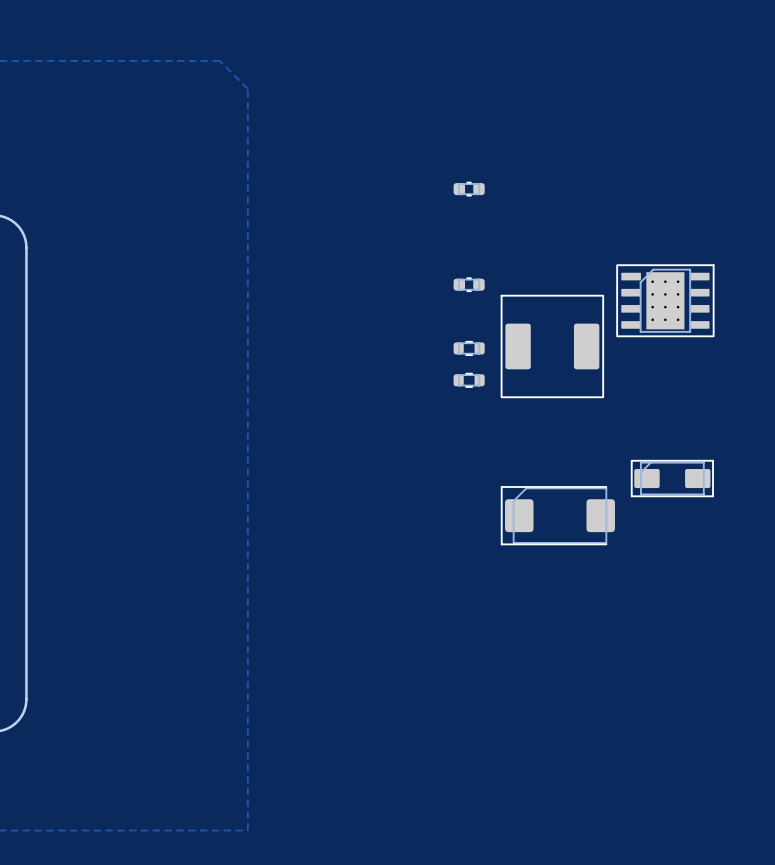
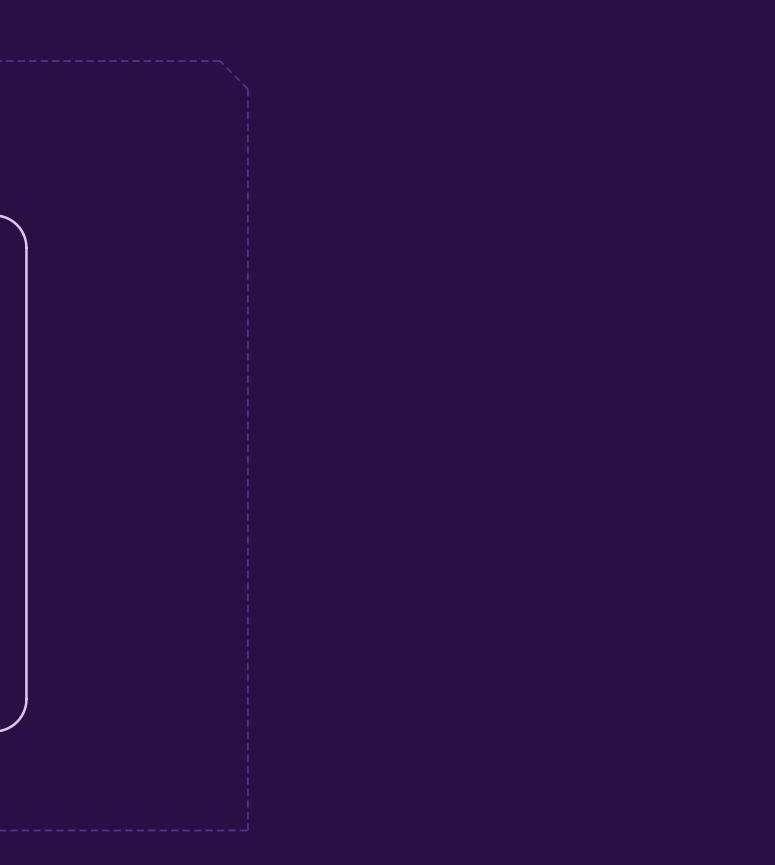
part: (469, 189) -> none
part: (469, 284) -> none
part: (665, 300) -> none
part: (552, 346) -> none
part: (469, 348) -> none
part: (469, 380) -> none
part: (672, 478) -> none
part: (557, 515) -> none

